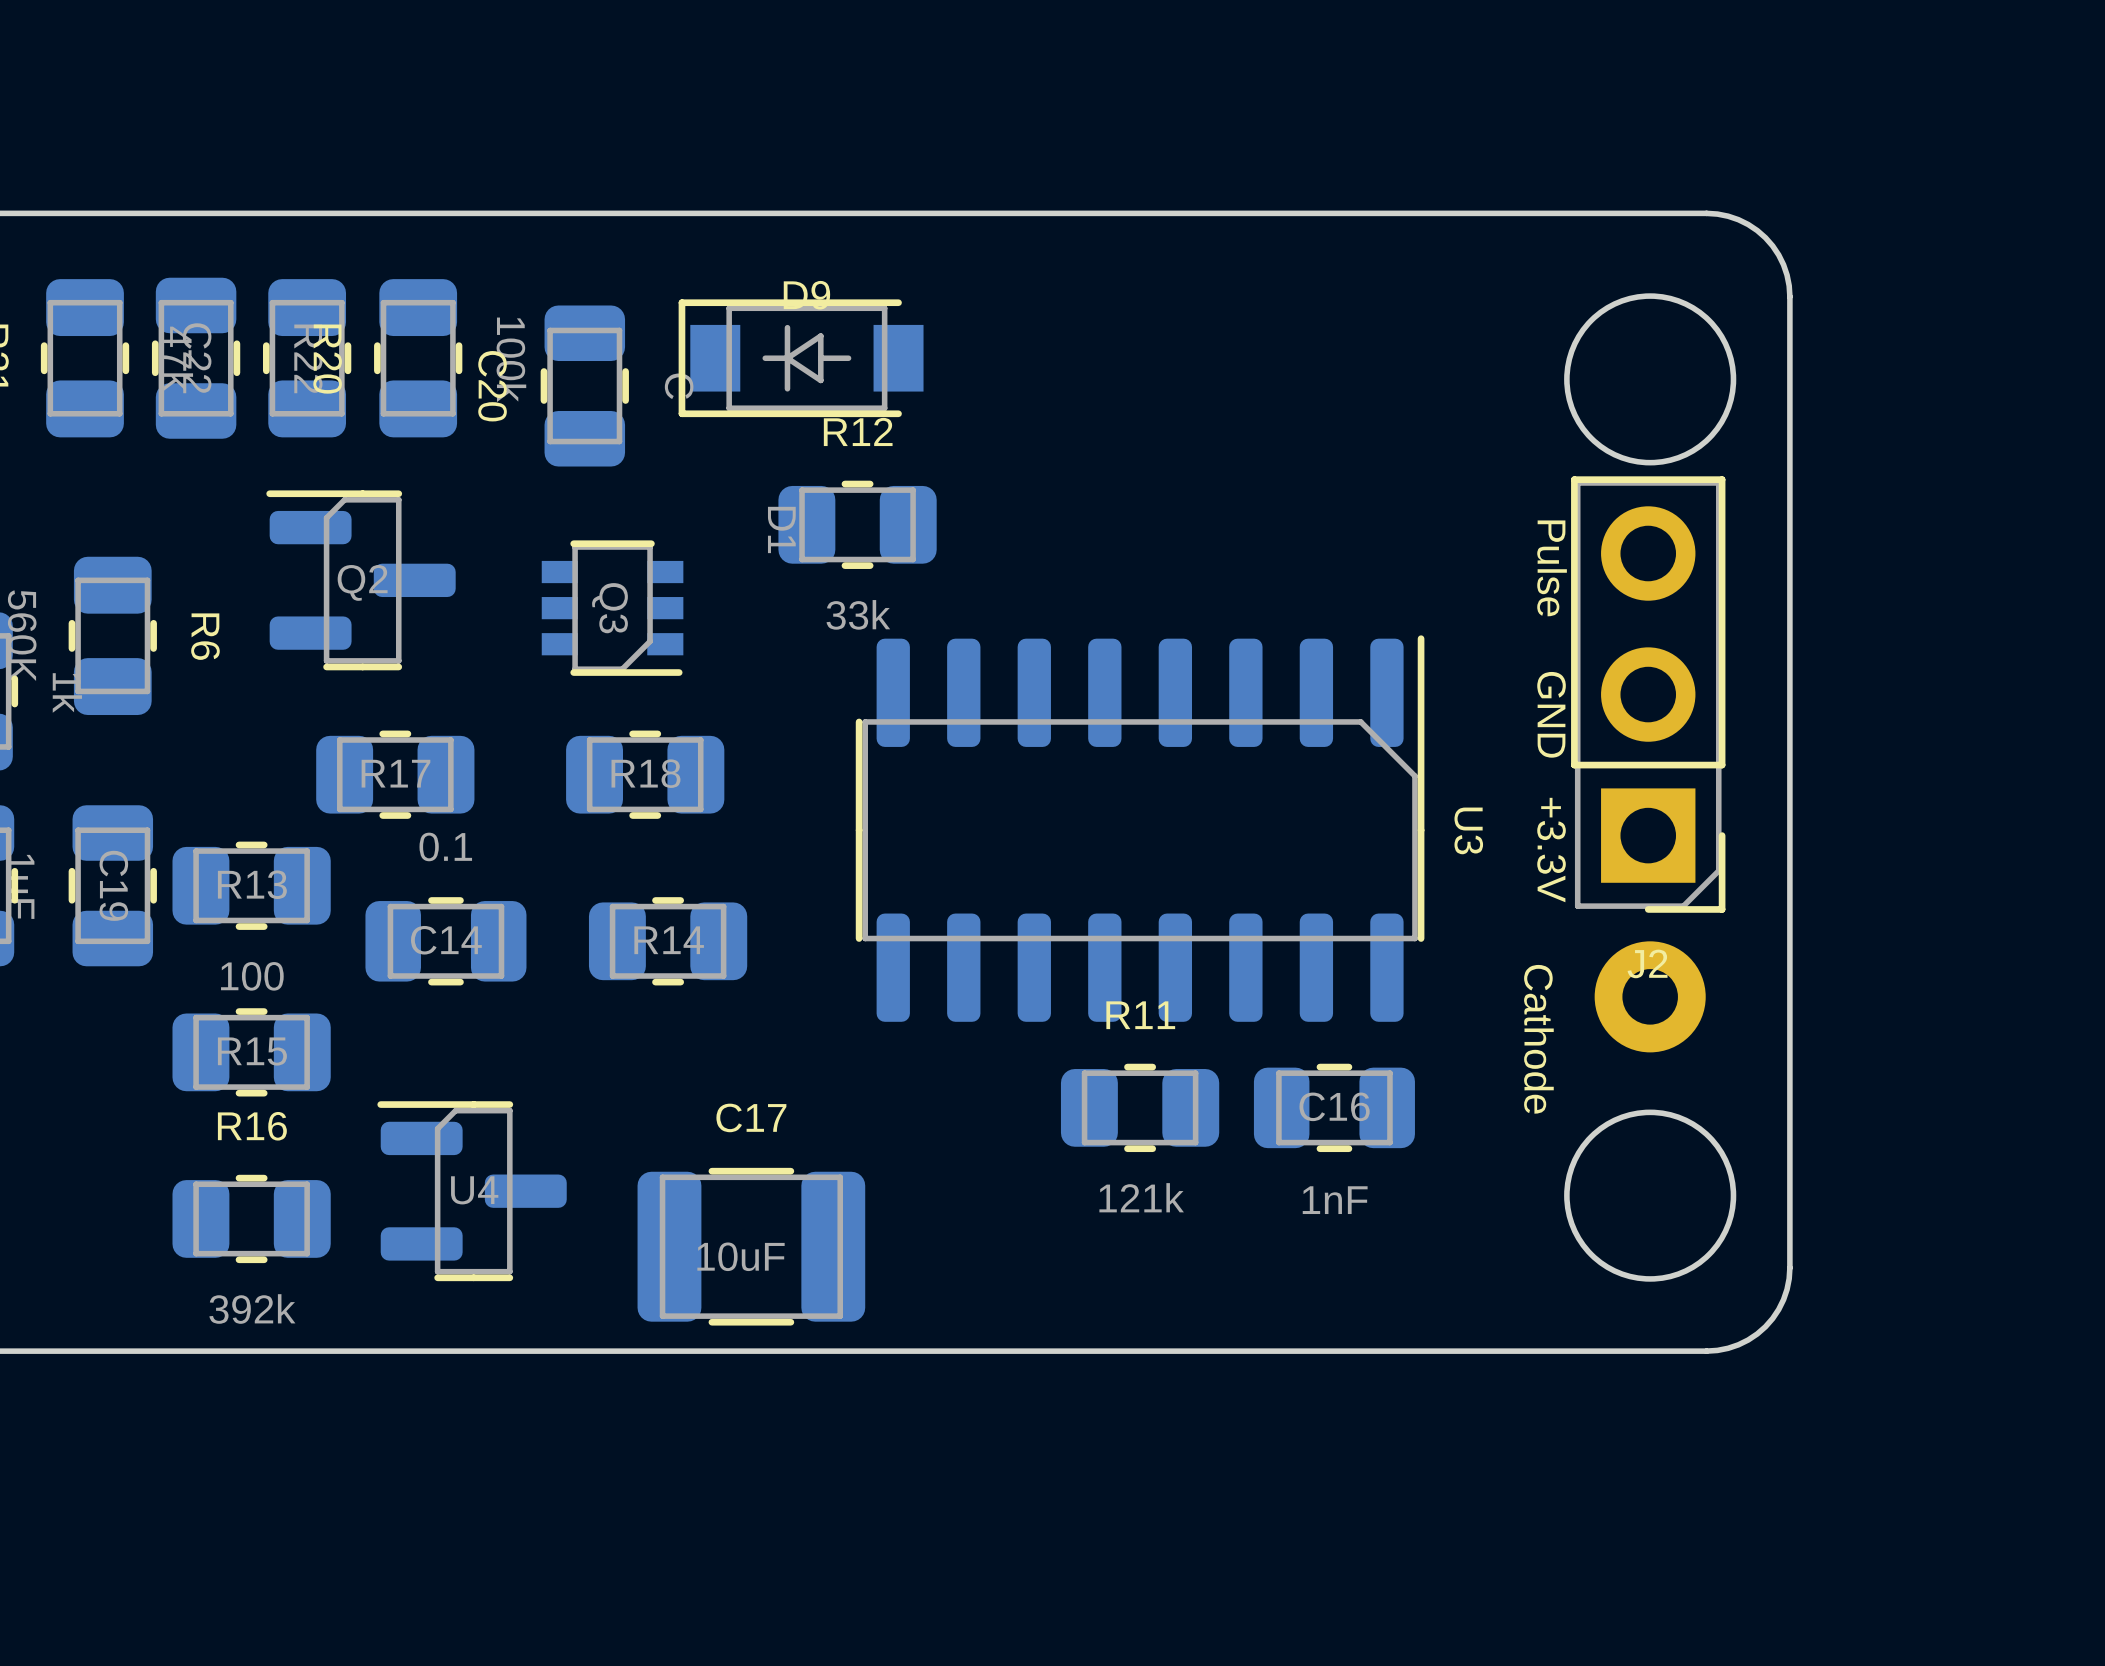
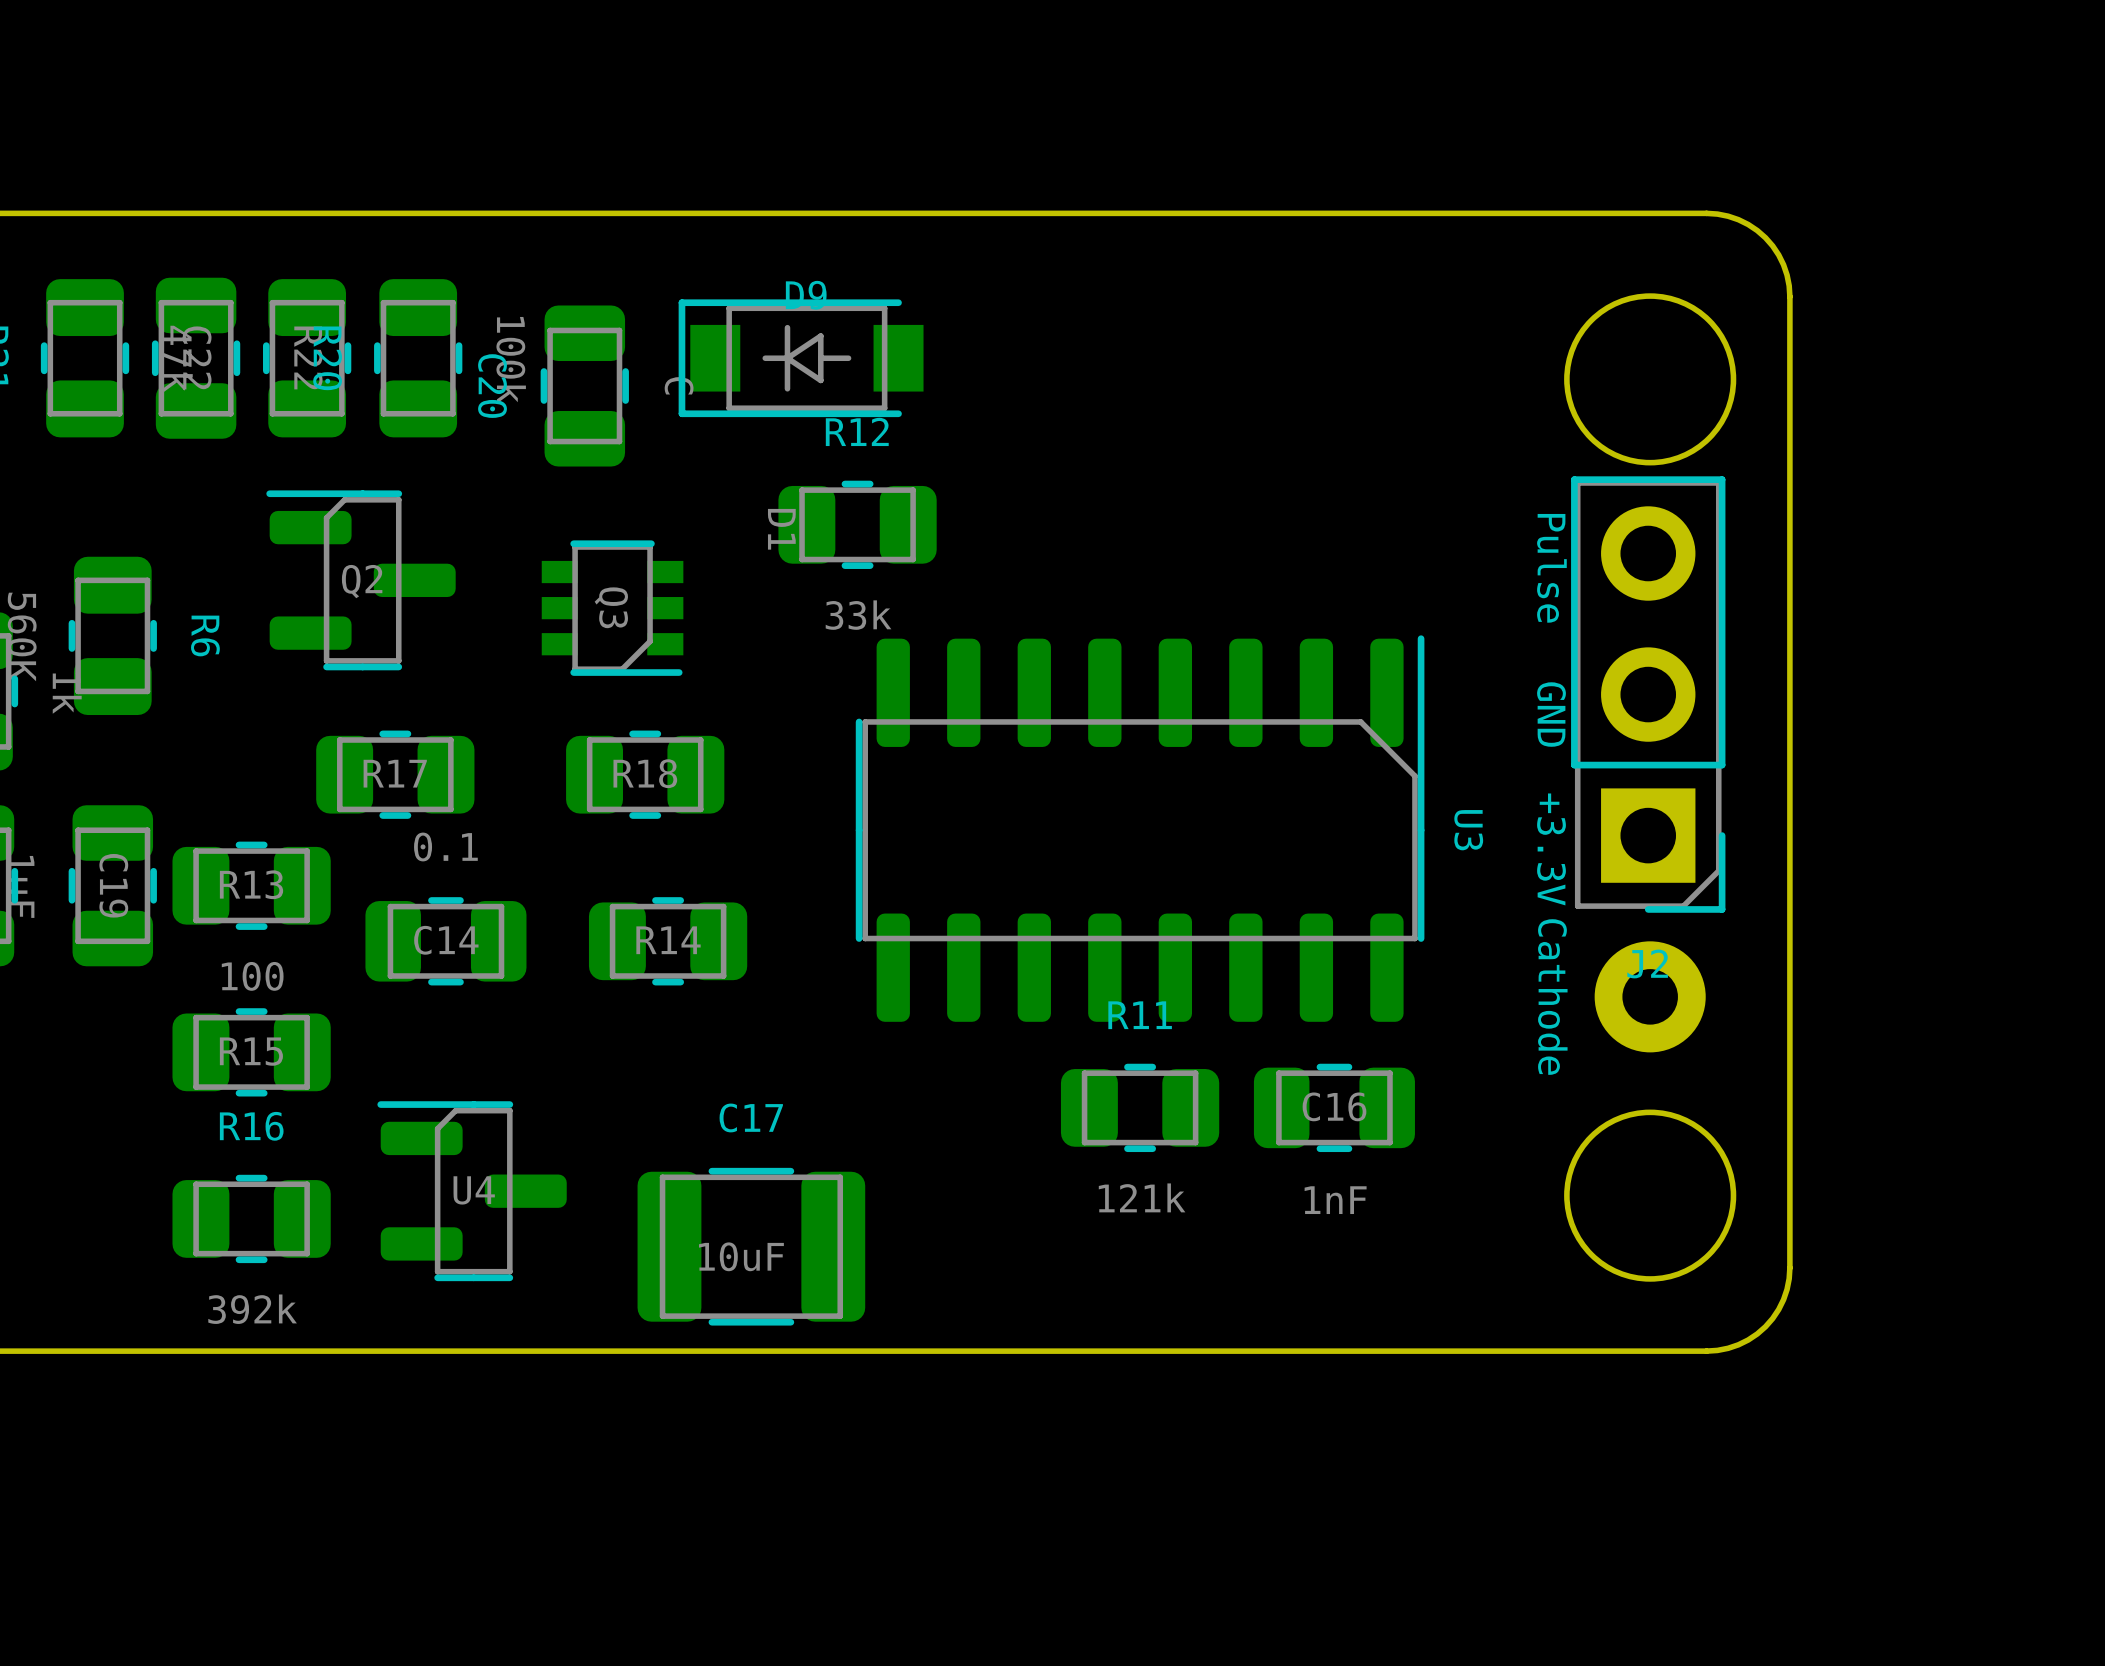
part value position: Cathode (1538, 1039) -> Cathode (1552, 997)

